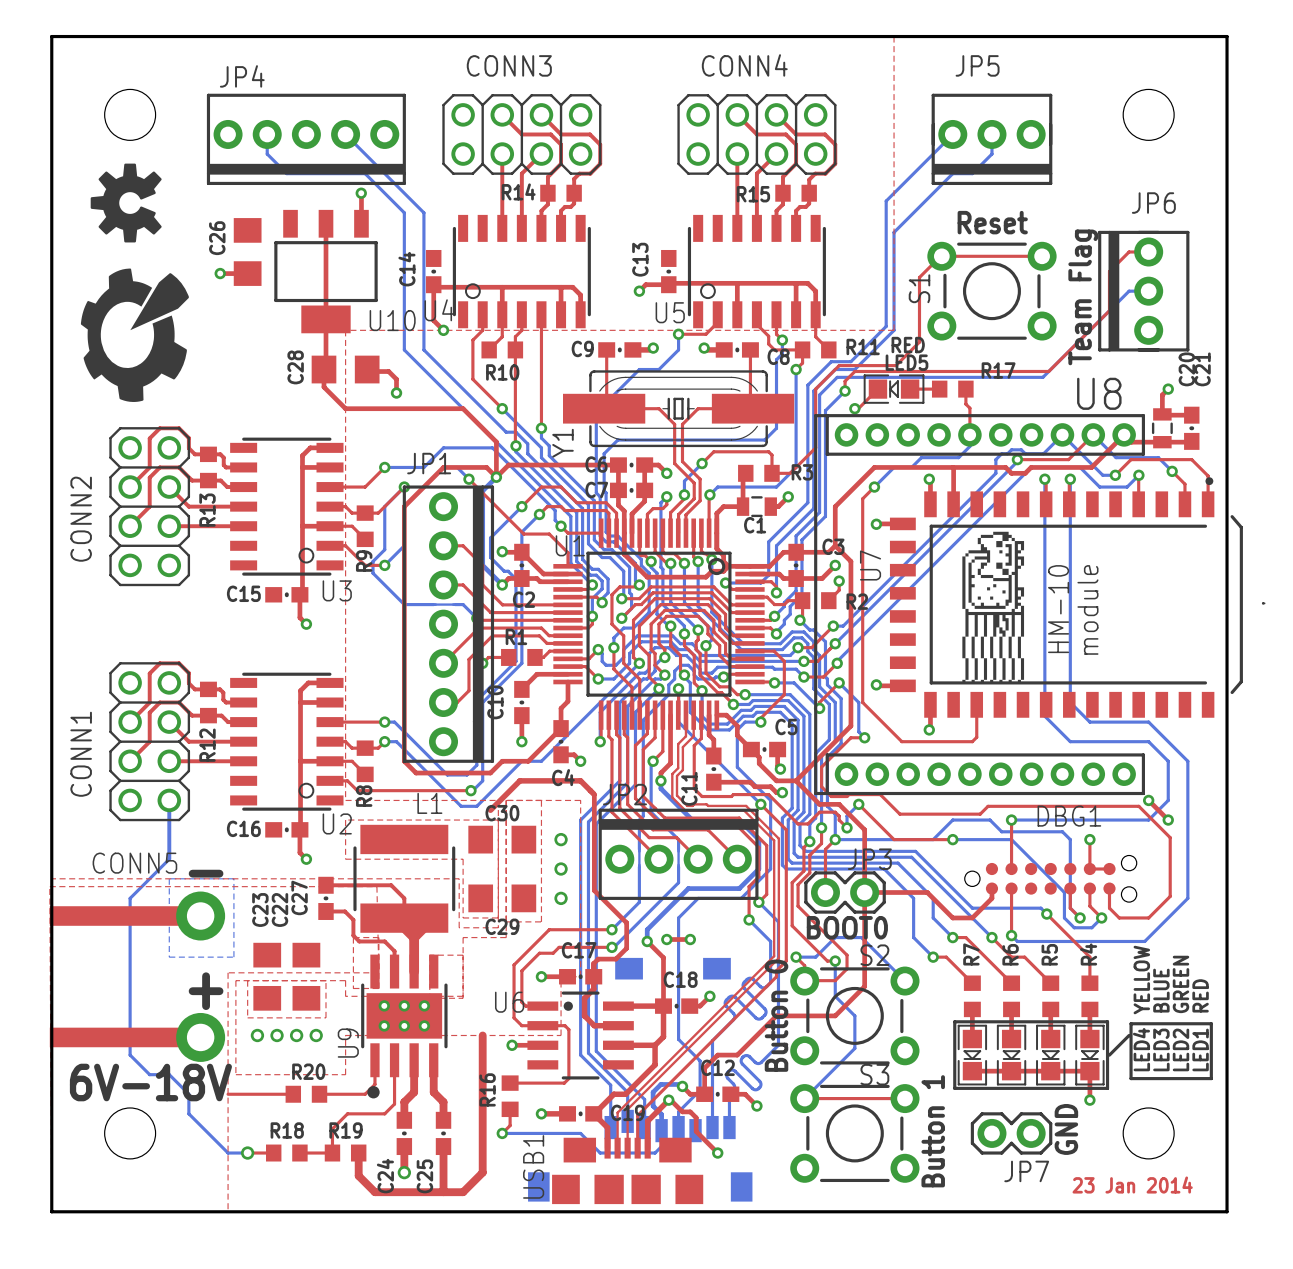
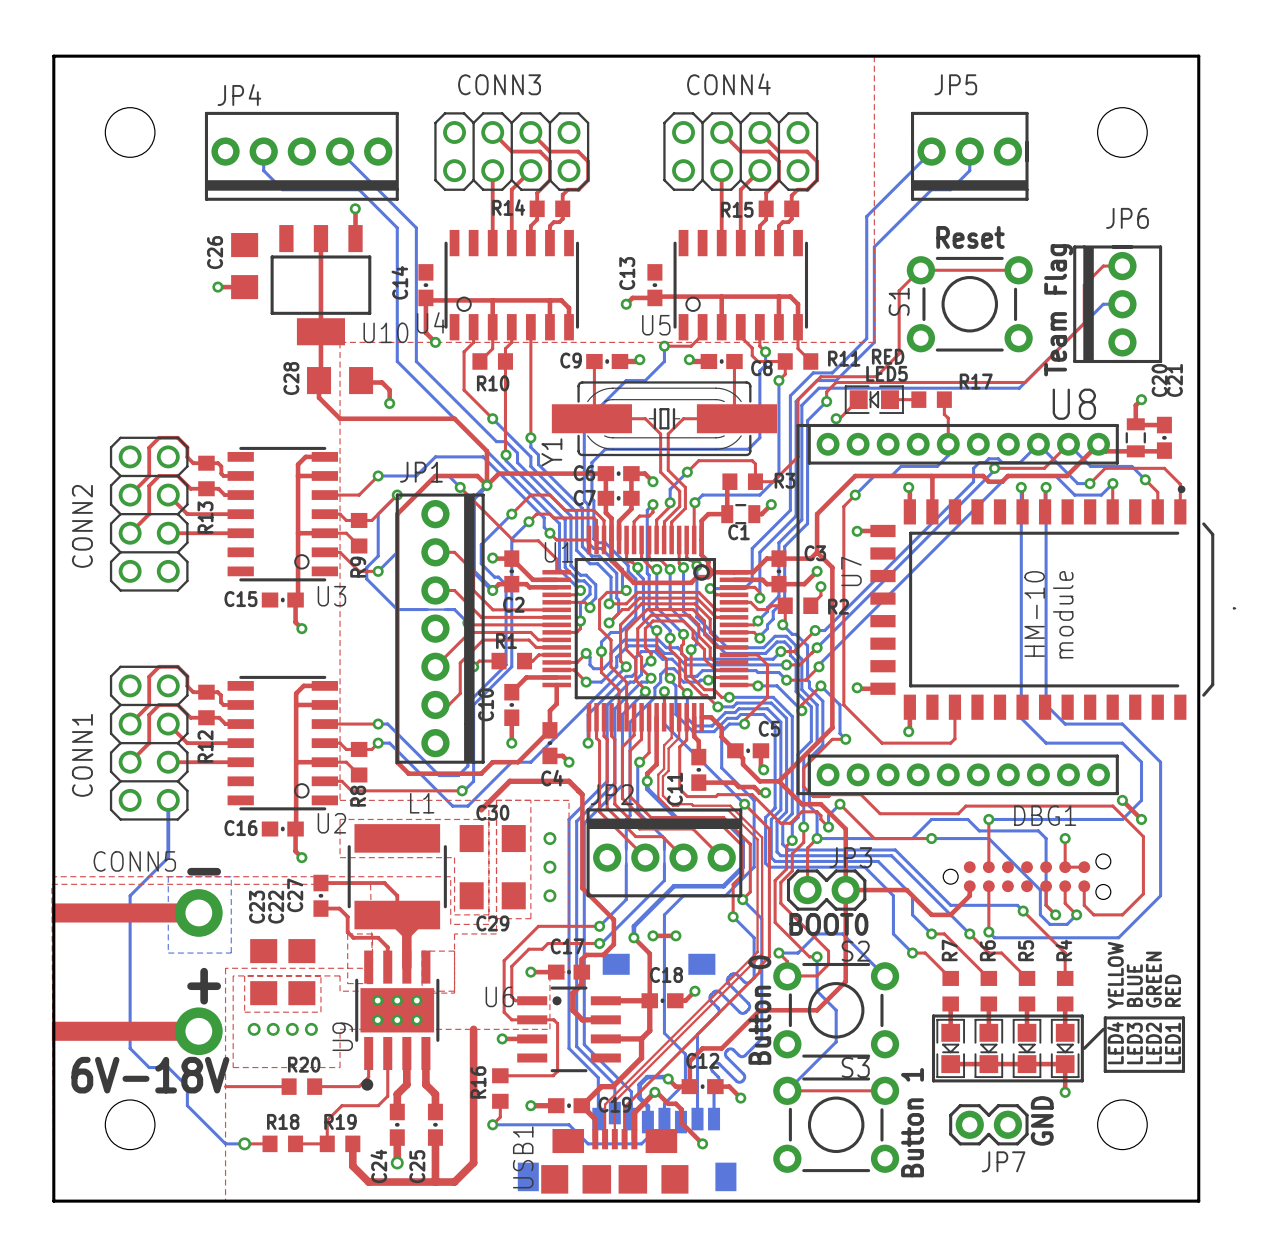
drawing: [90, 163, 162, 243] -> none
drawing: [80, 268, 189, 402] -> none
drawing: [962, 531, 1025, 683] -> none
text: 23 Jan 2014 (1132, 1185) -> none

